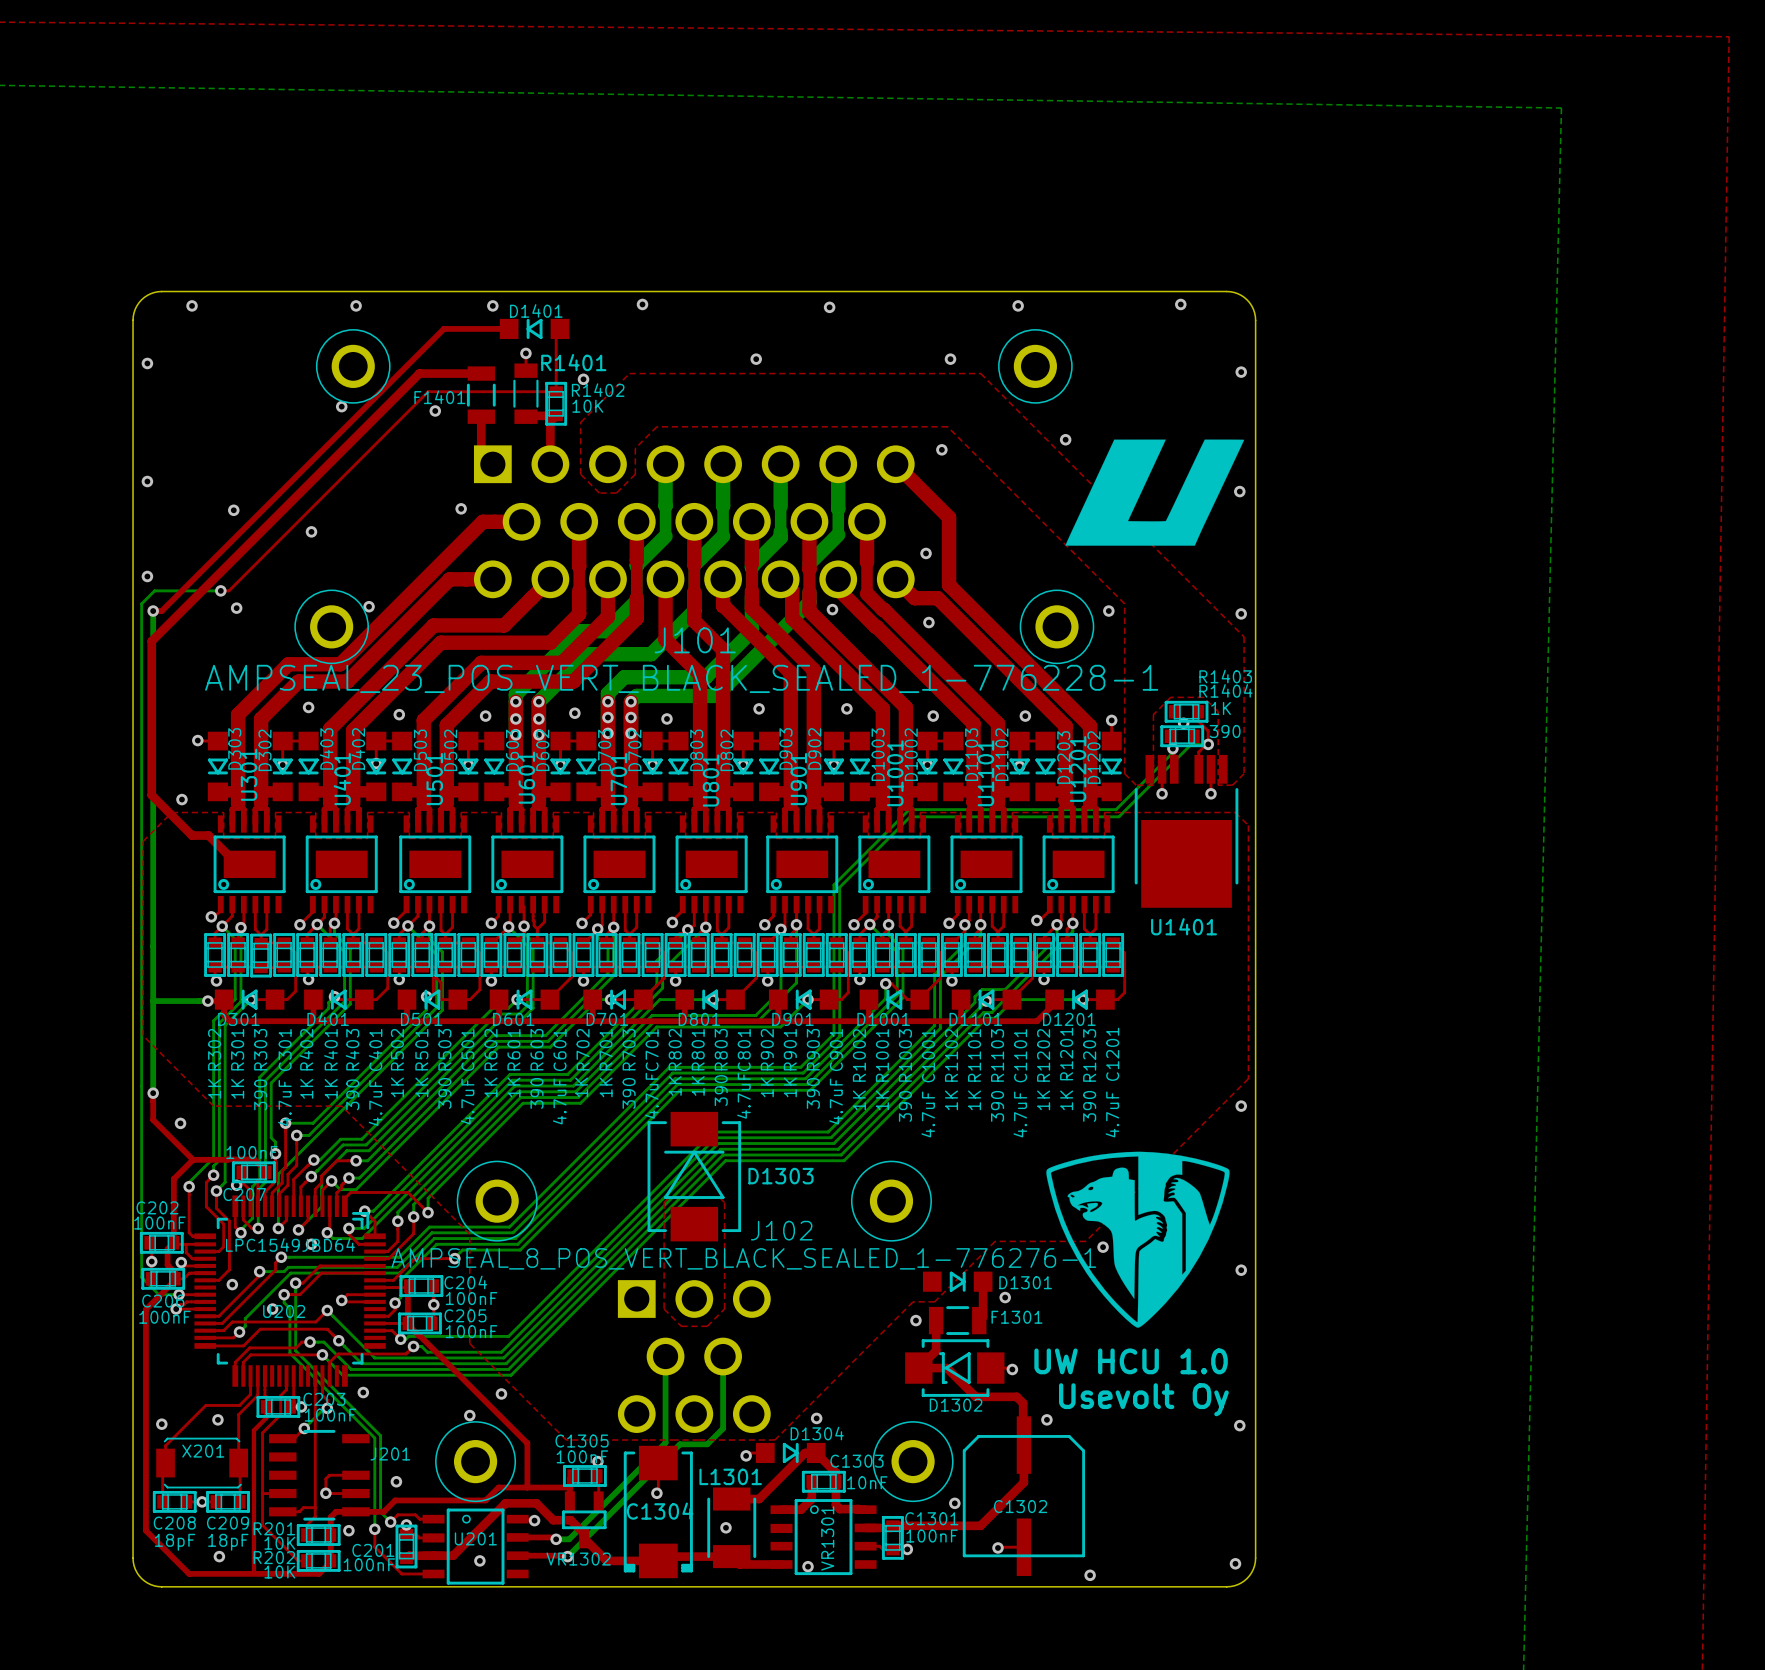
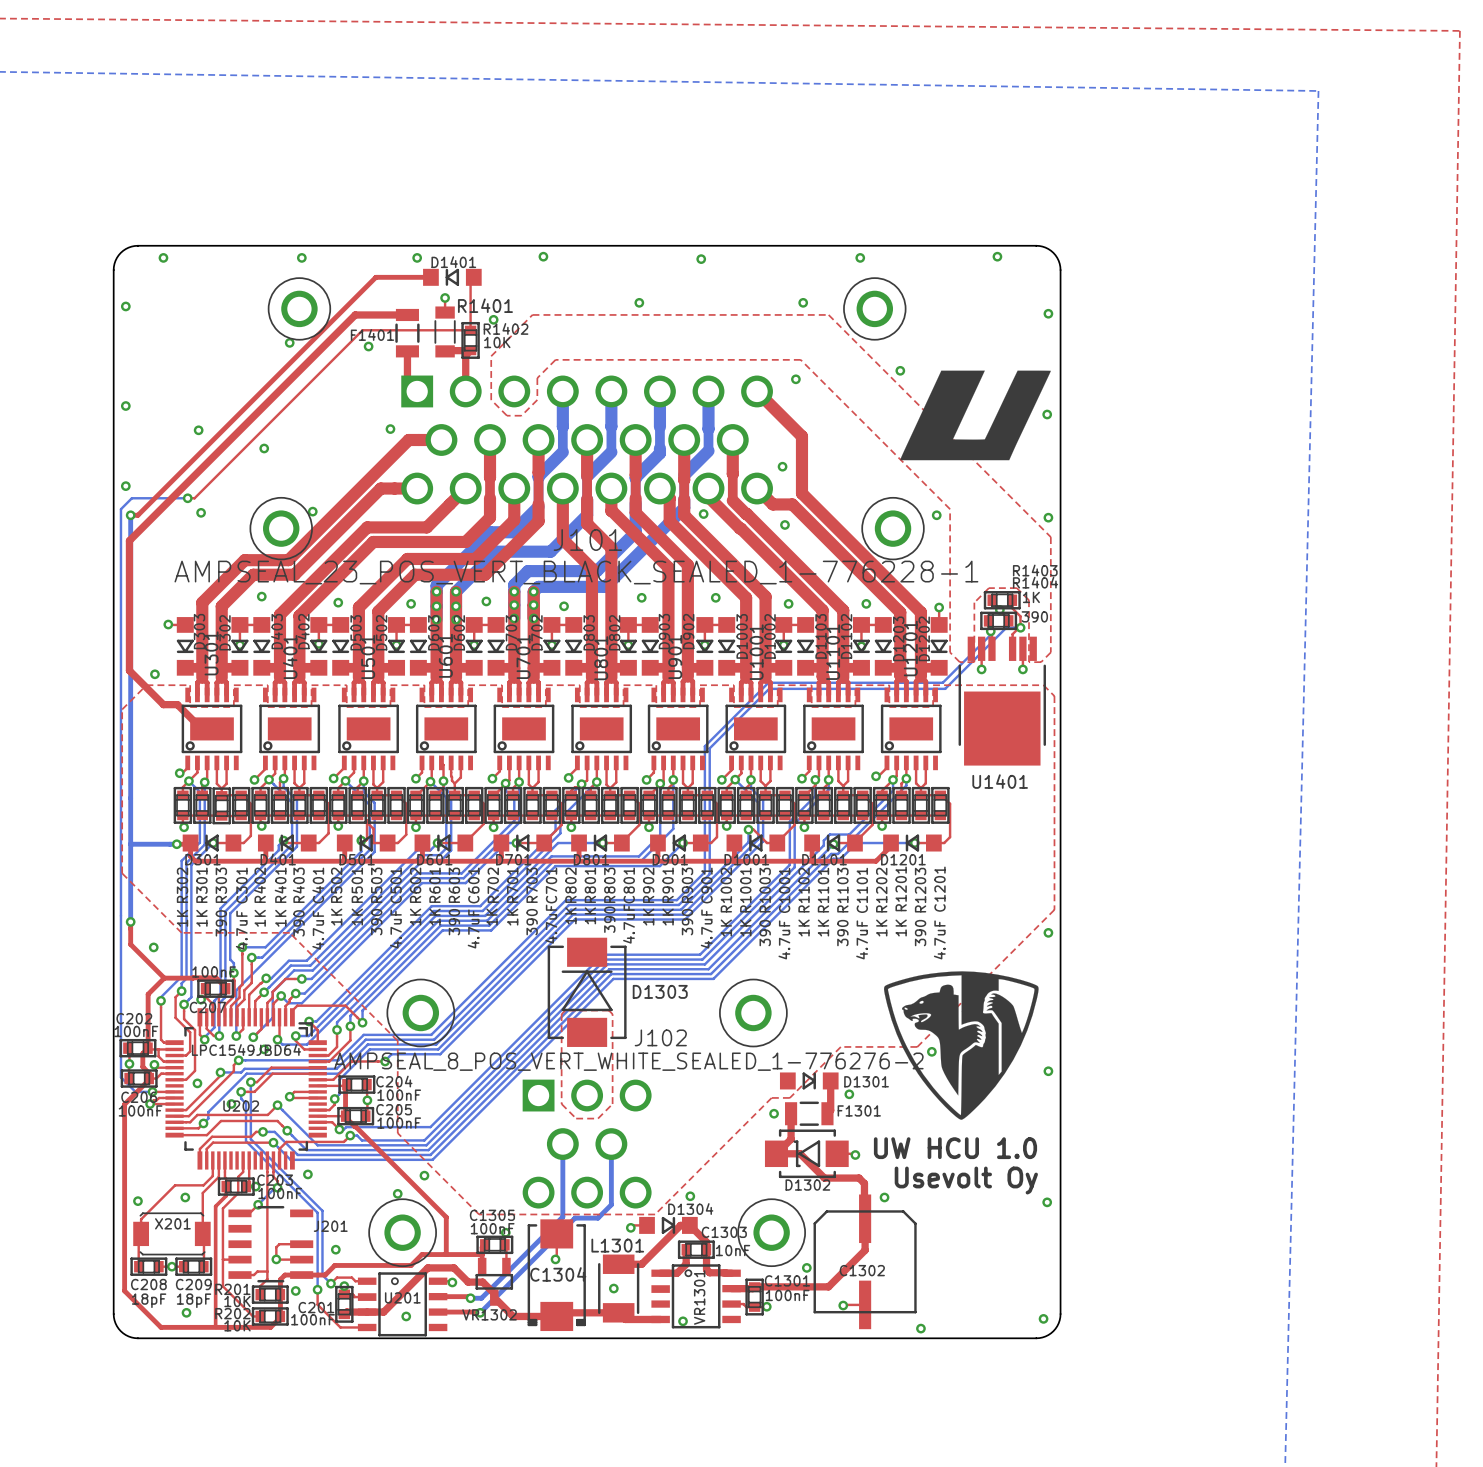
J102 value: AMPSEAL_8_POS_VERT_BLACK_SEALED_1-776276-1 (743, 1258) -> AMPSEAL_8_POS_VERT_WHITE_SEALED_1-776276-2 (628, 1061)

